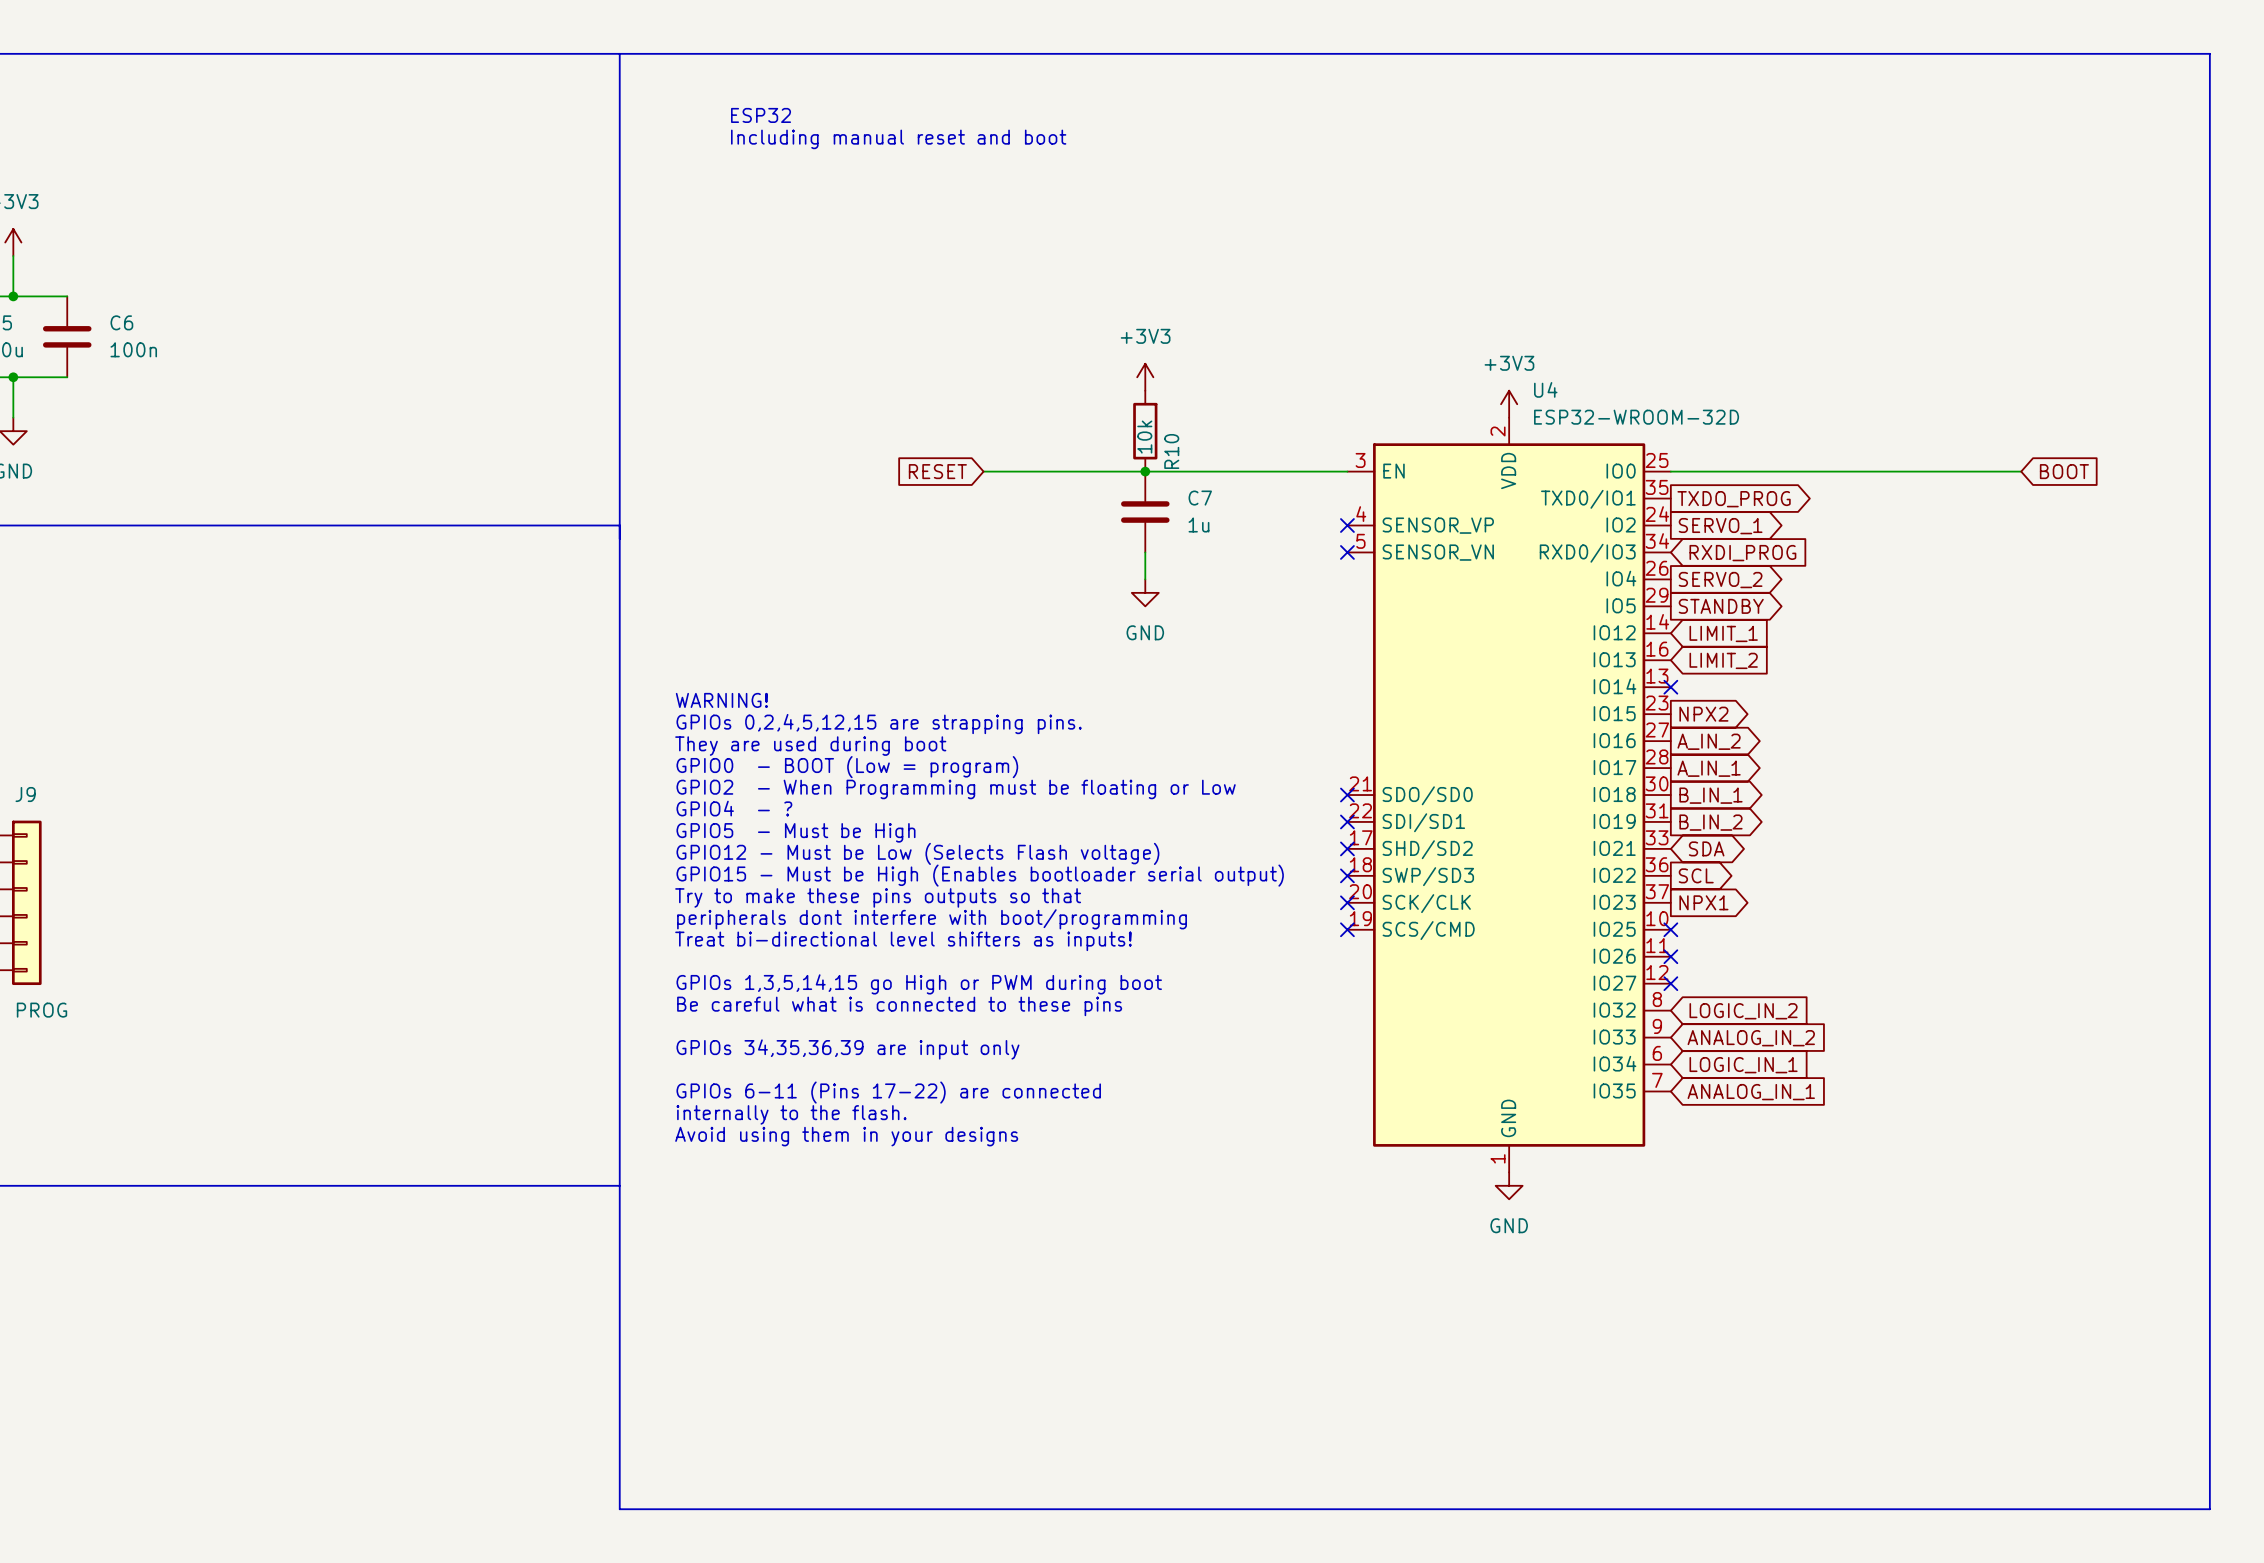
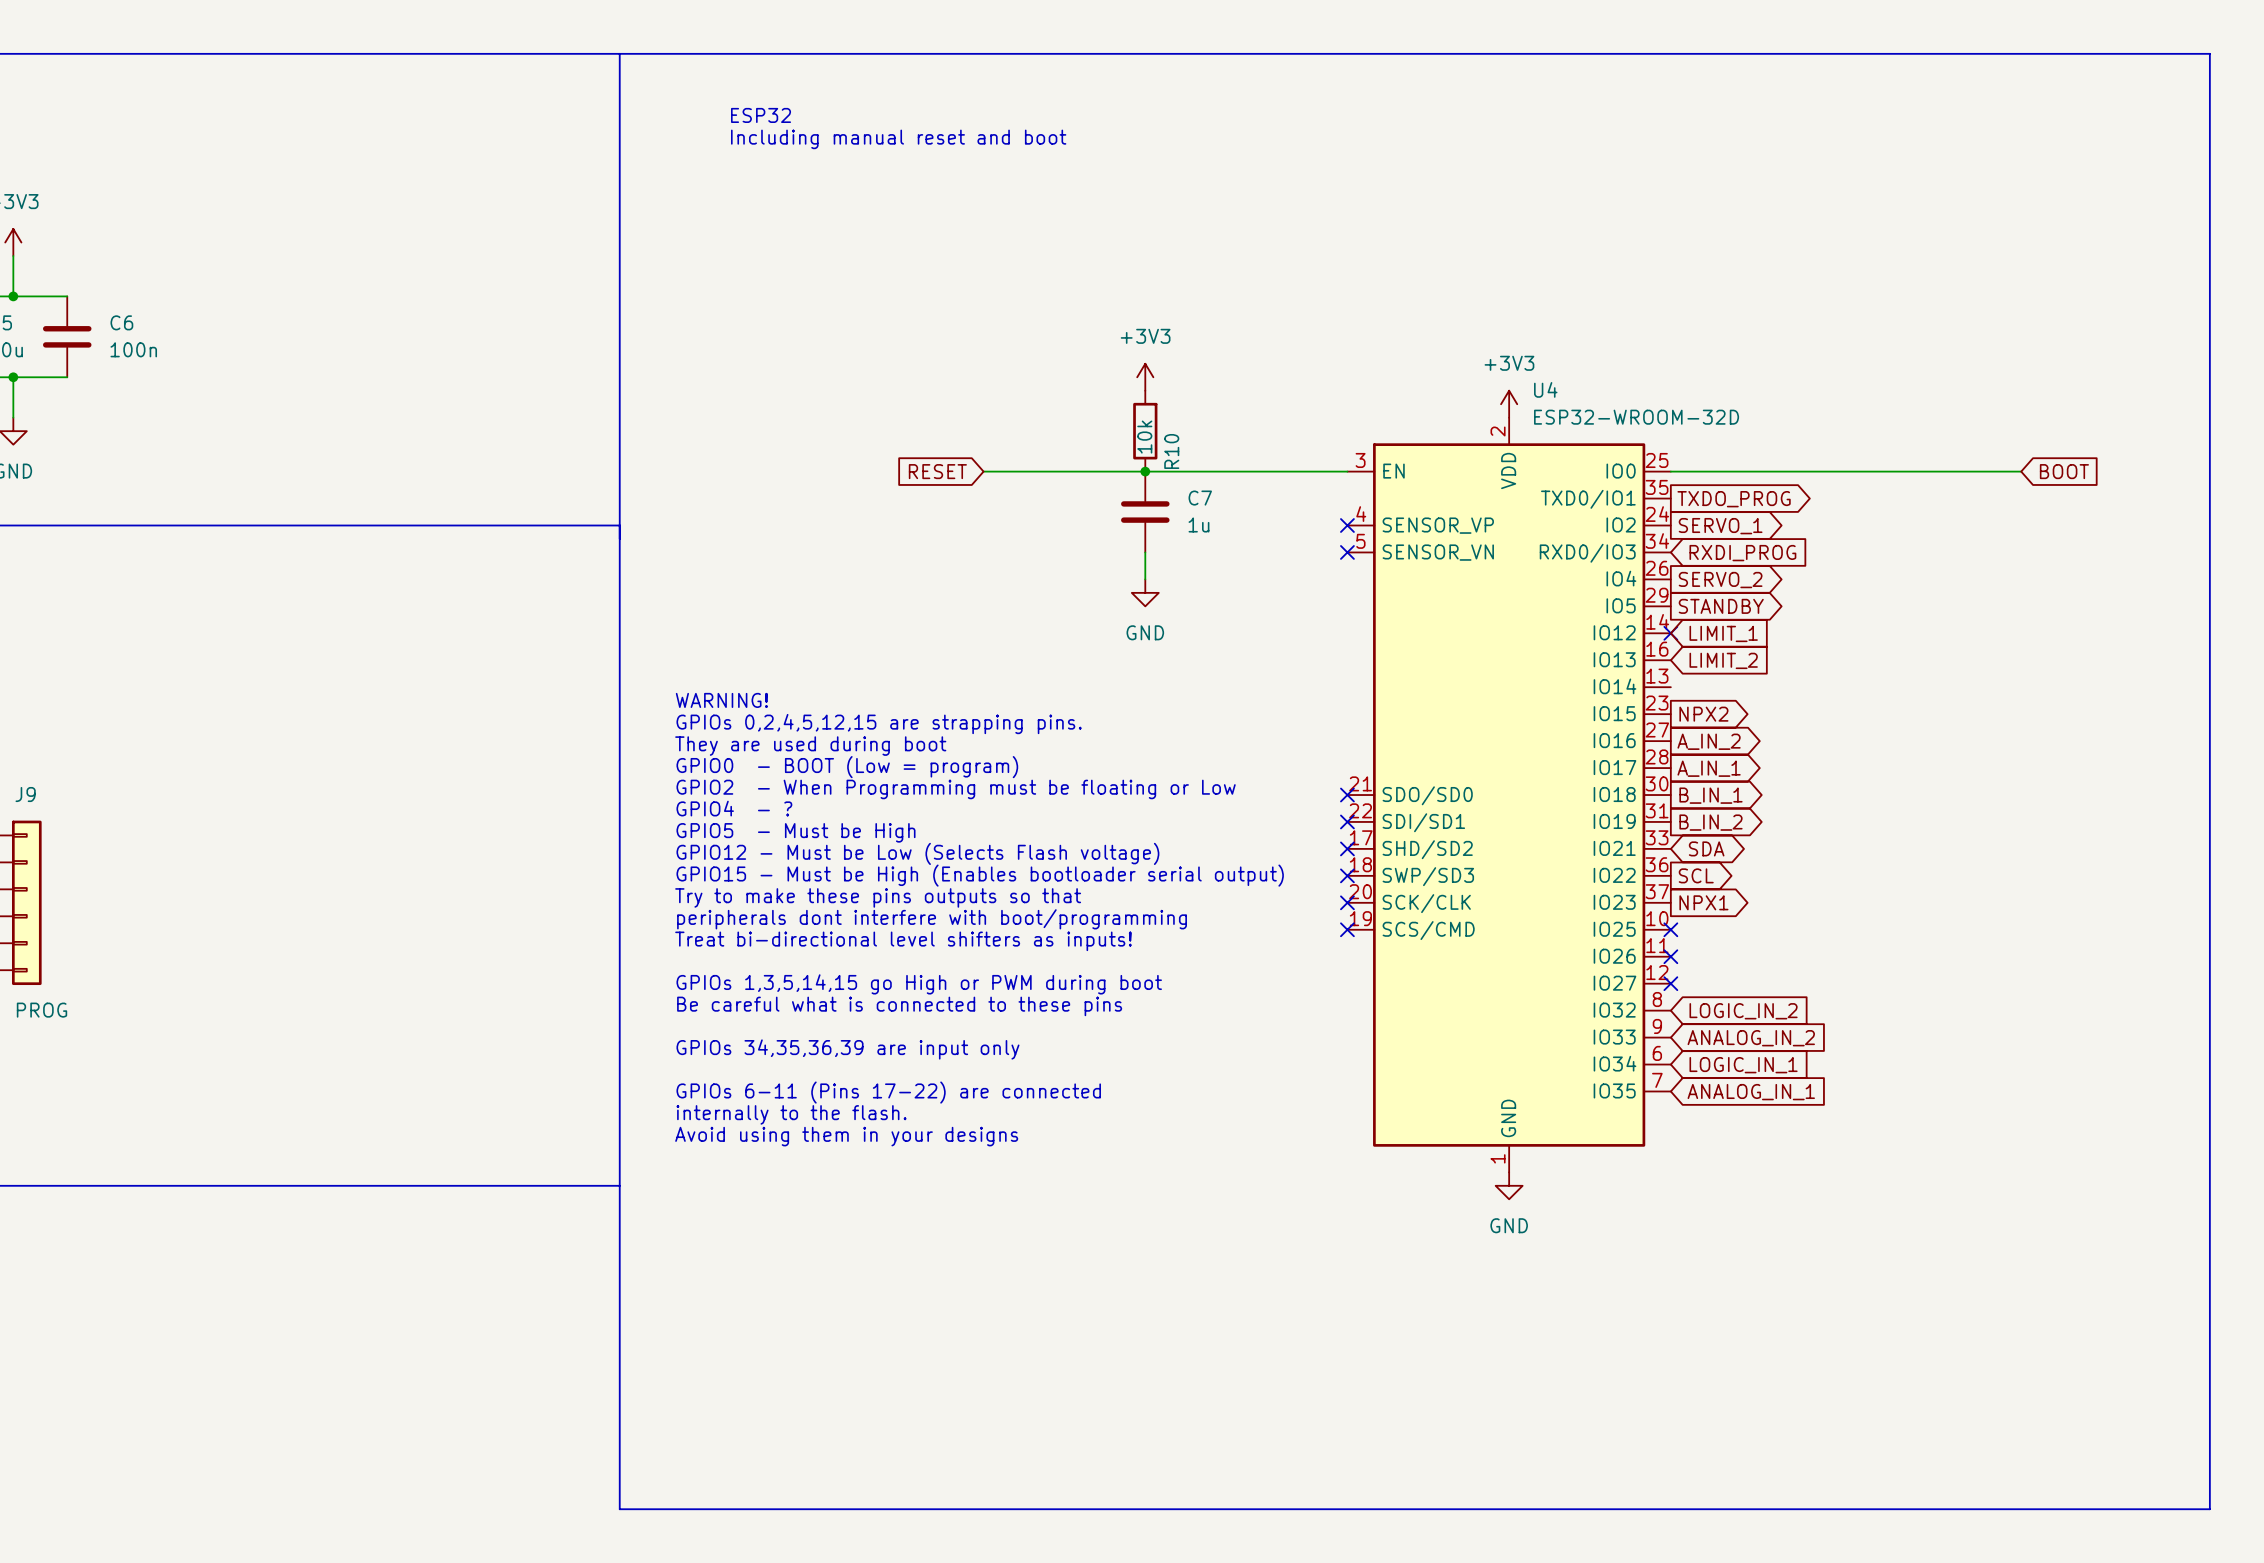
no-connect mark position: (1670, 687) -> (1670, 633)

